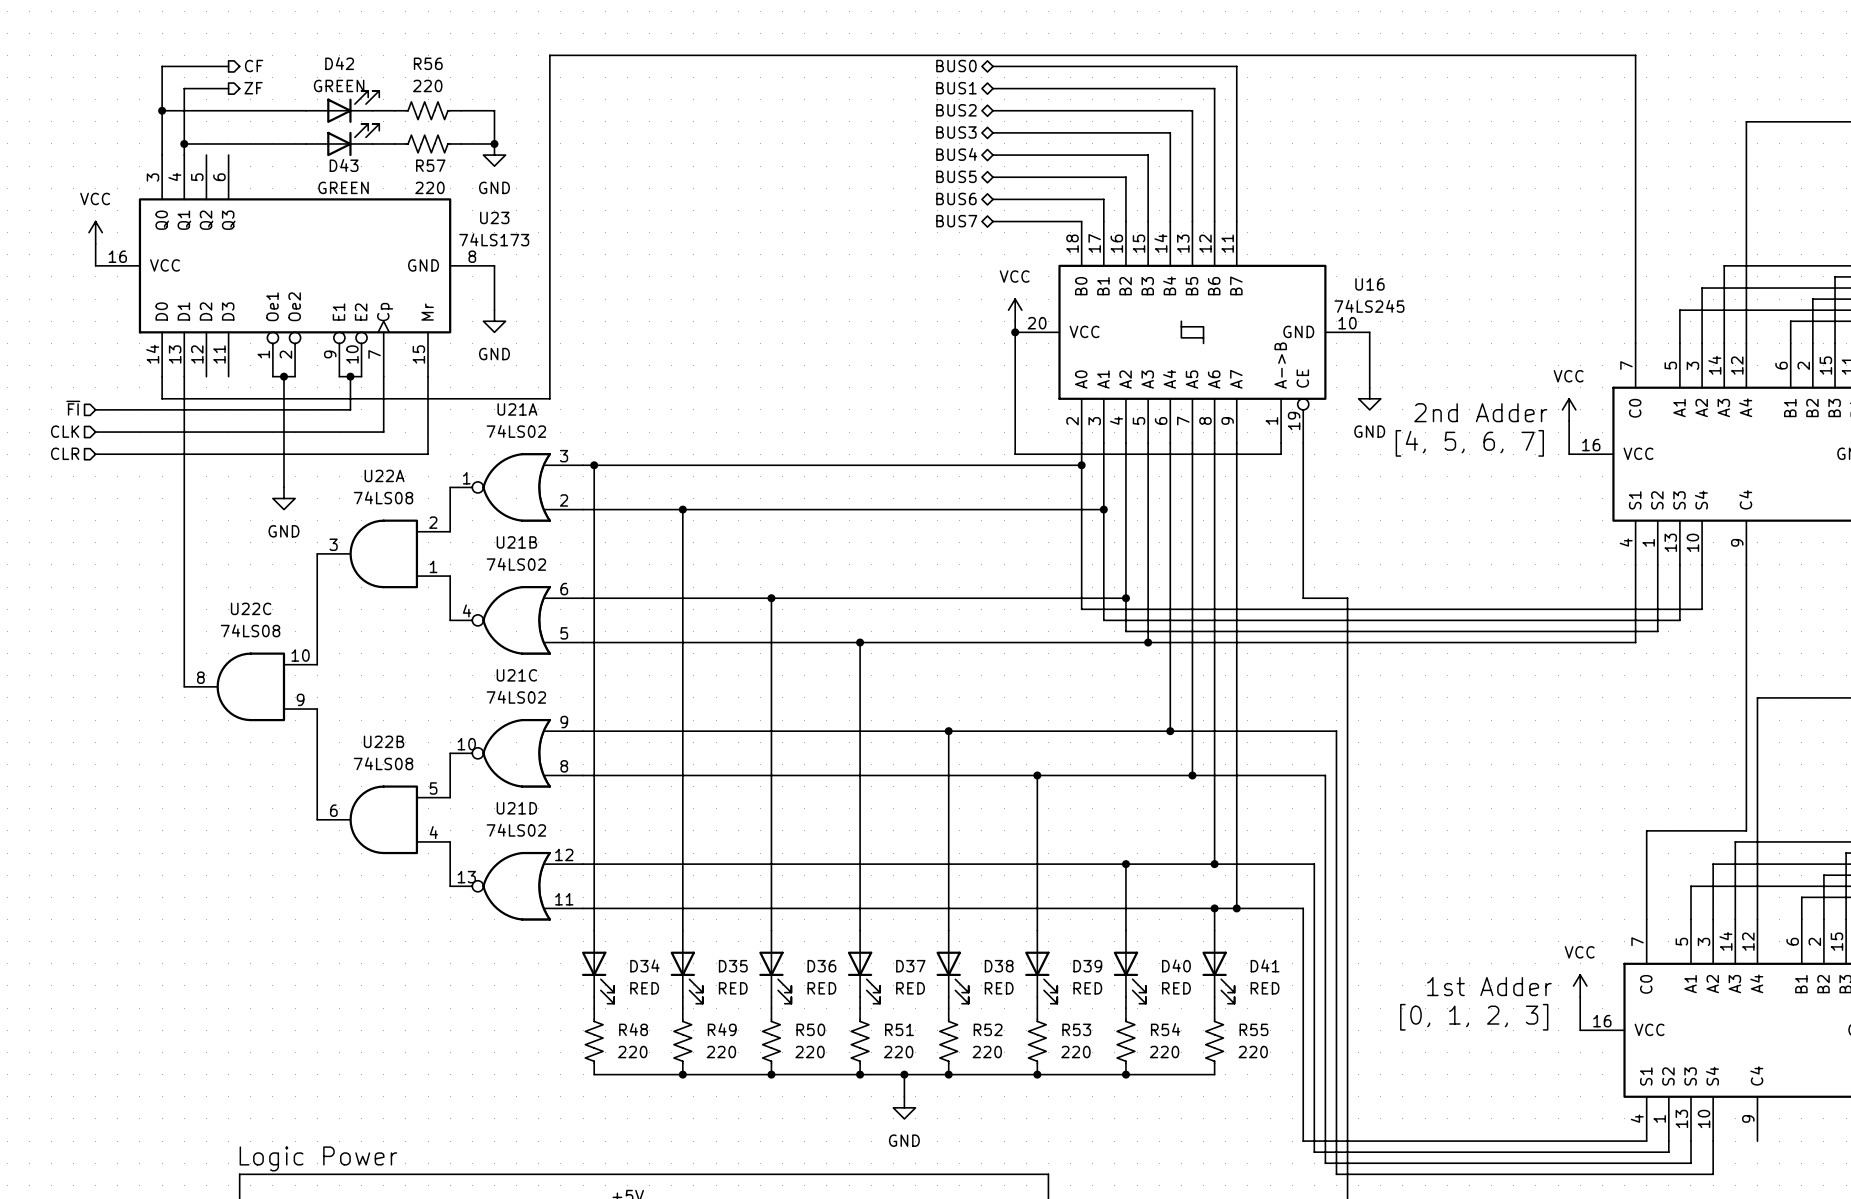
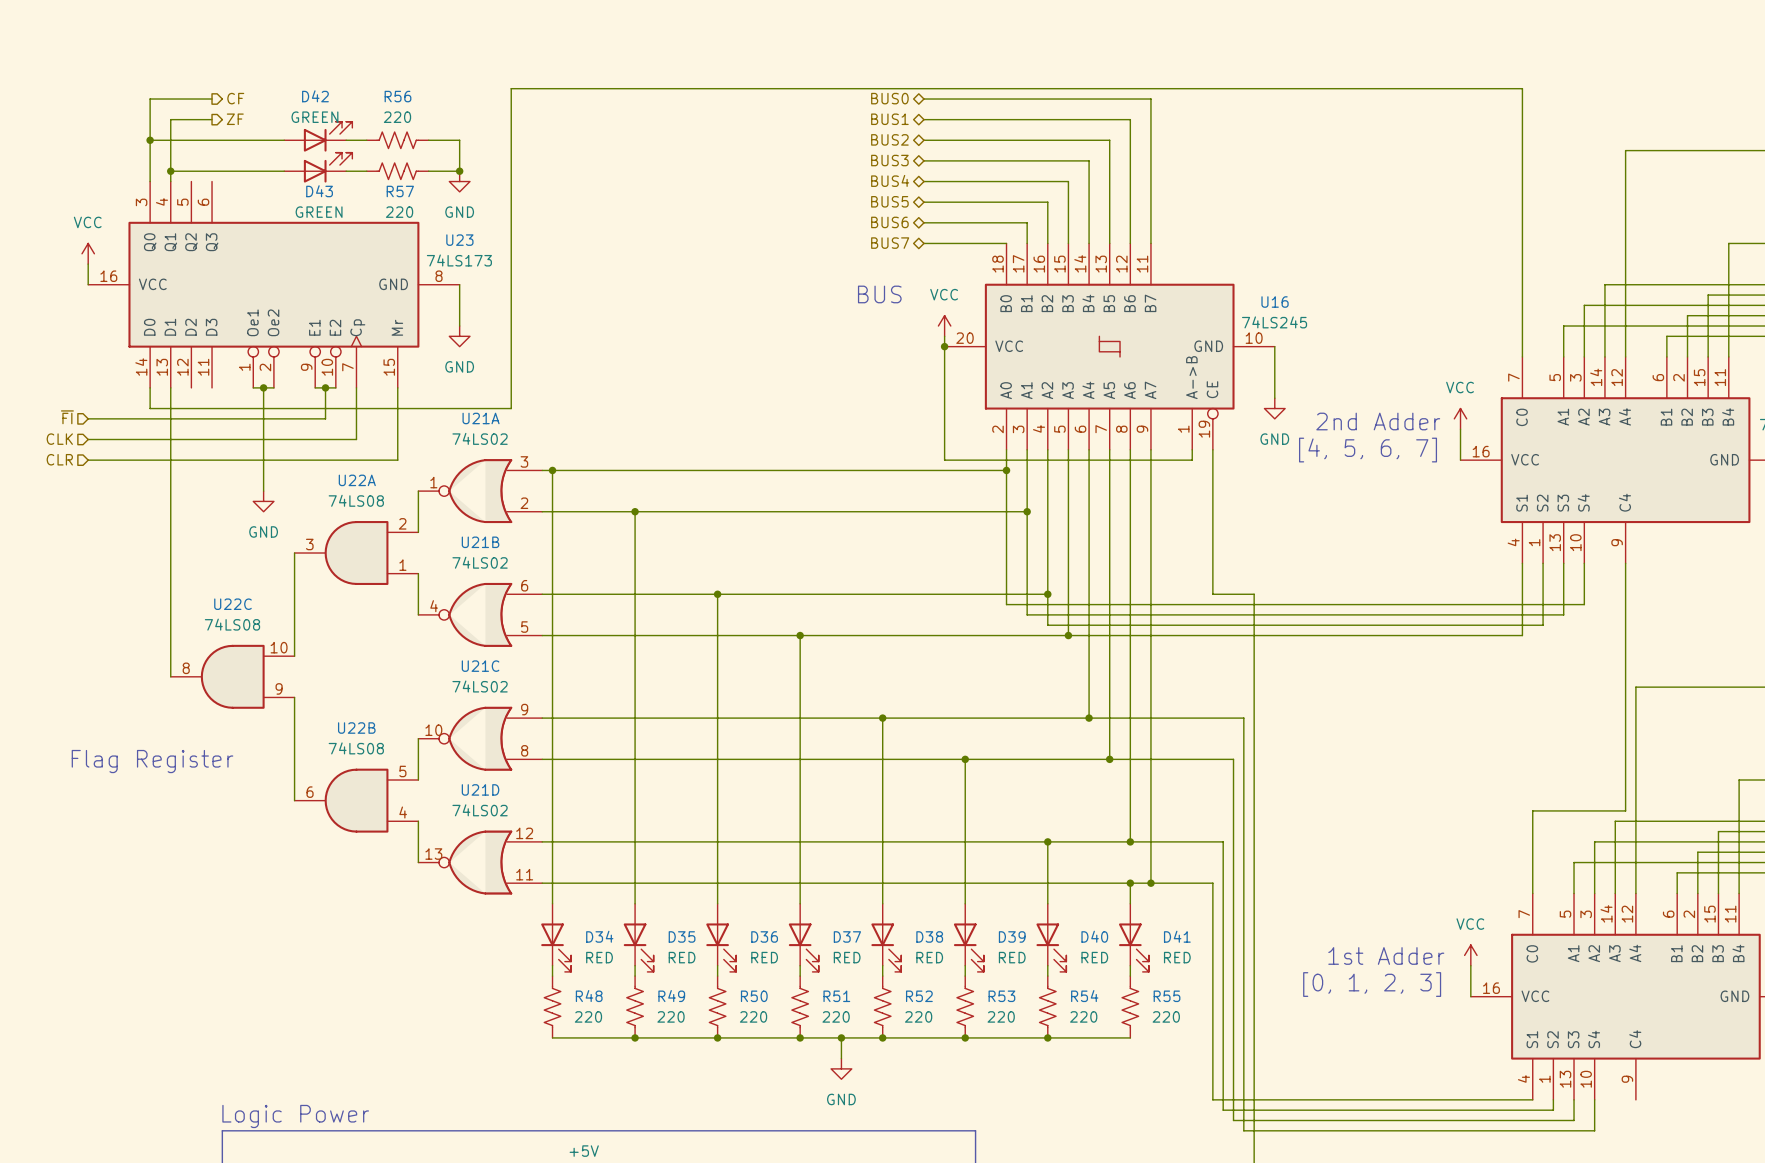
text: none -> BUS (879, 294)
text: none -> Flag Register (152, 761)

